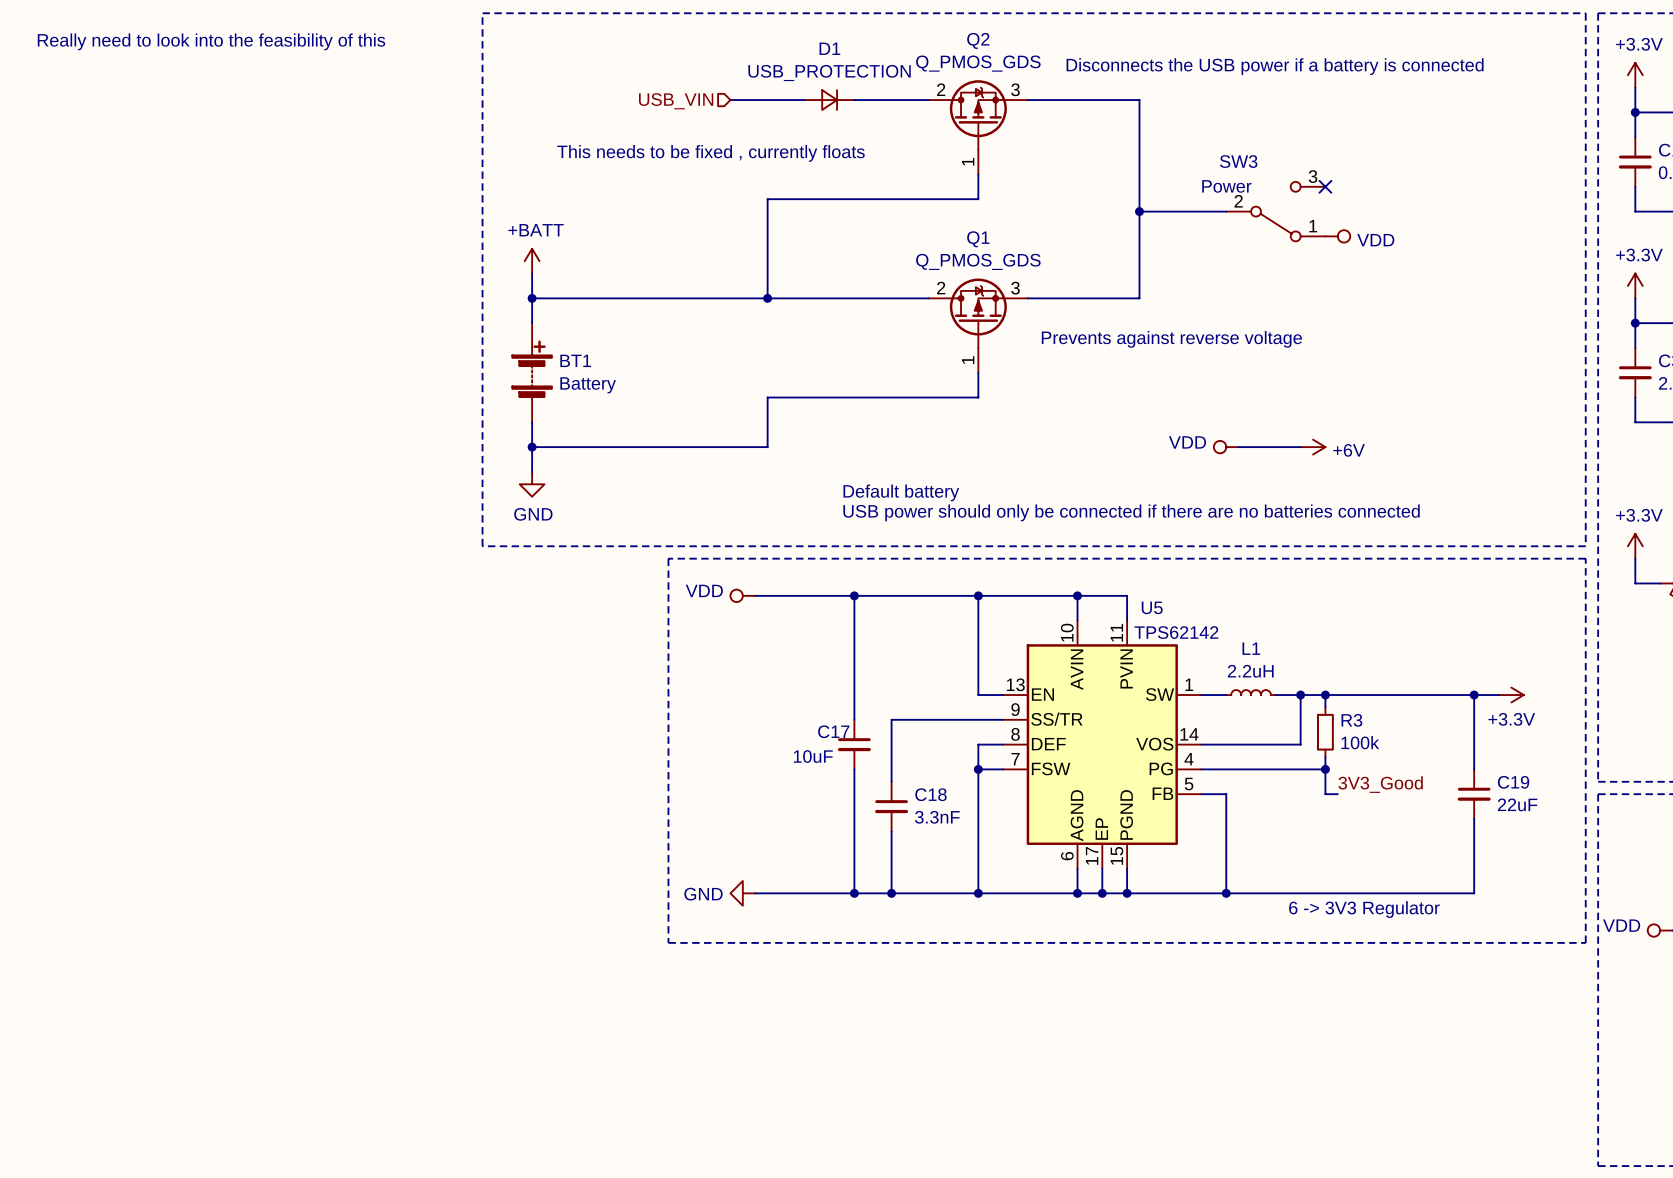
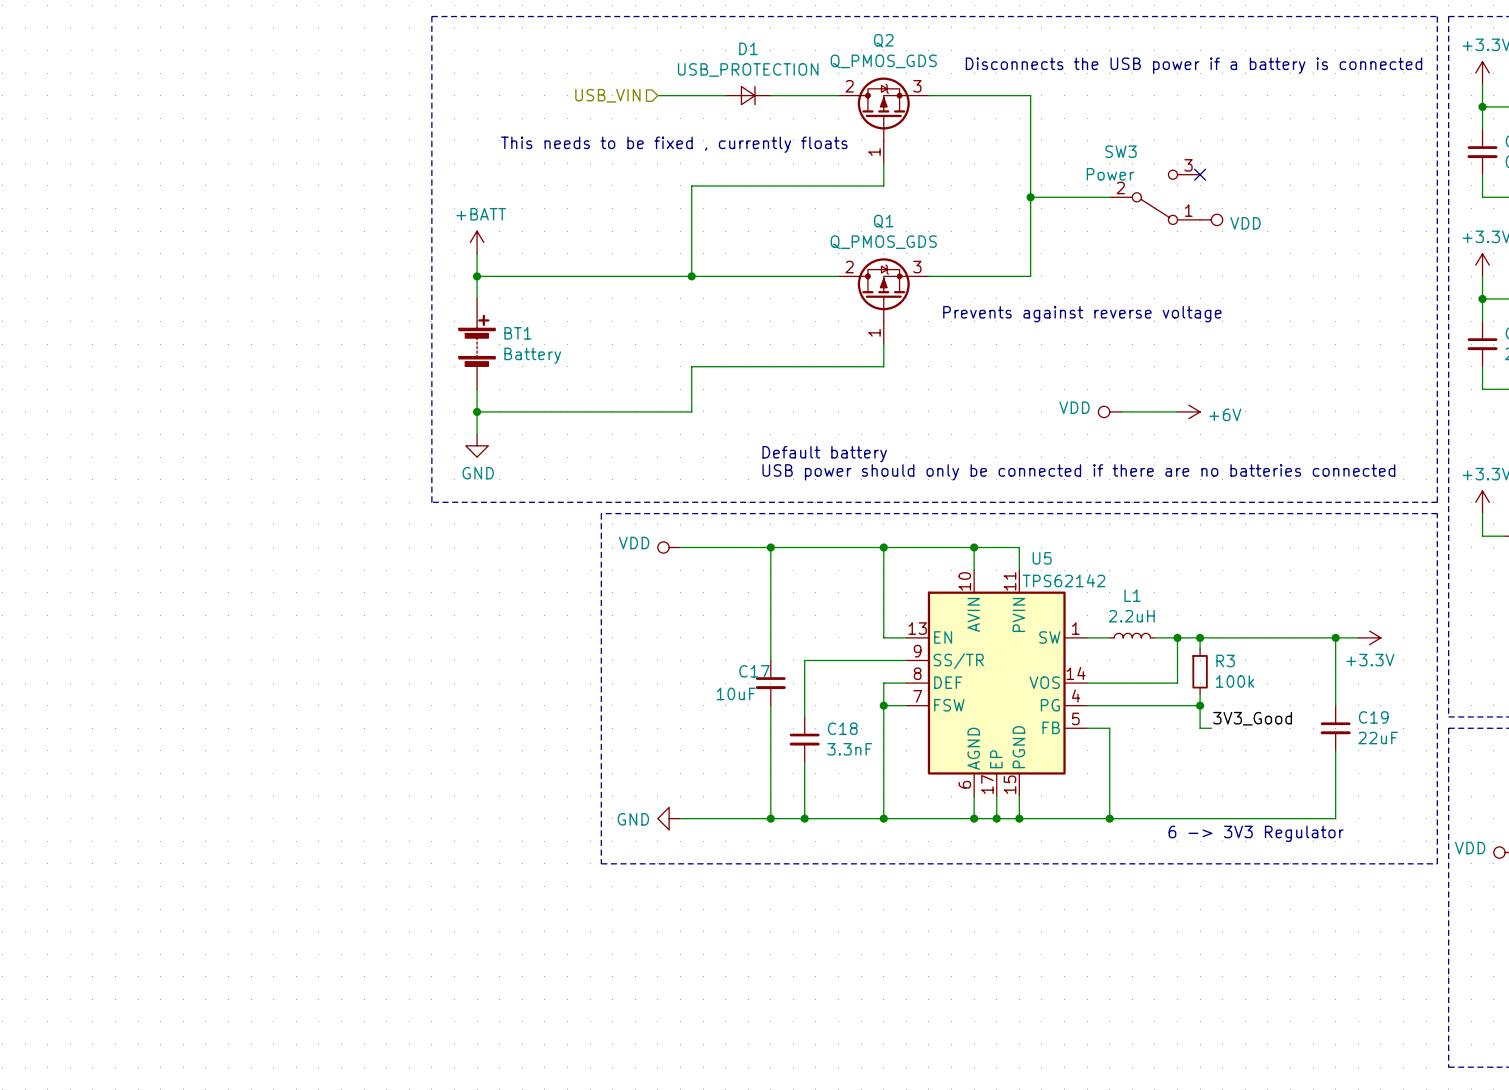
text: Really need to look into the feasibility of this (211, 41) -> none

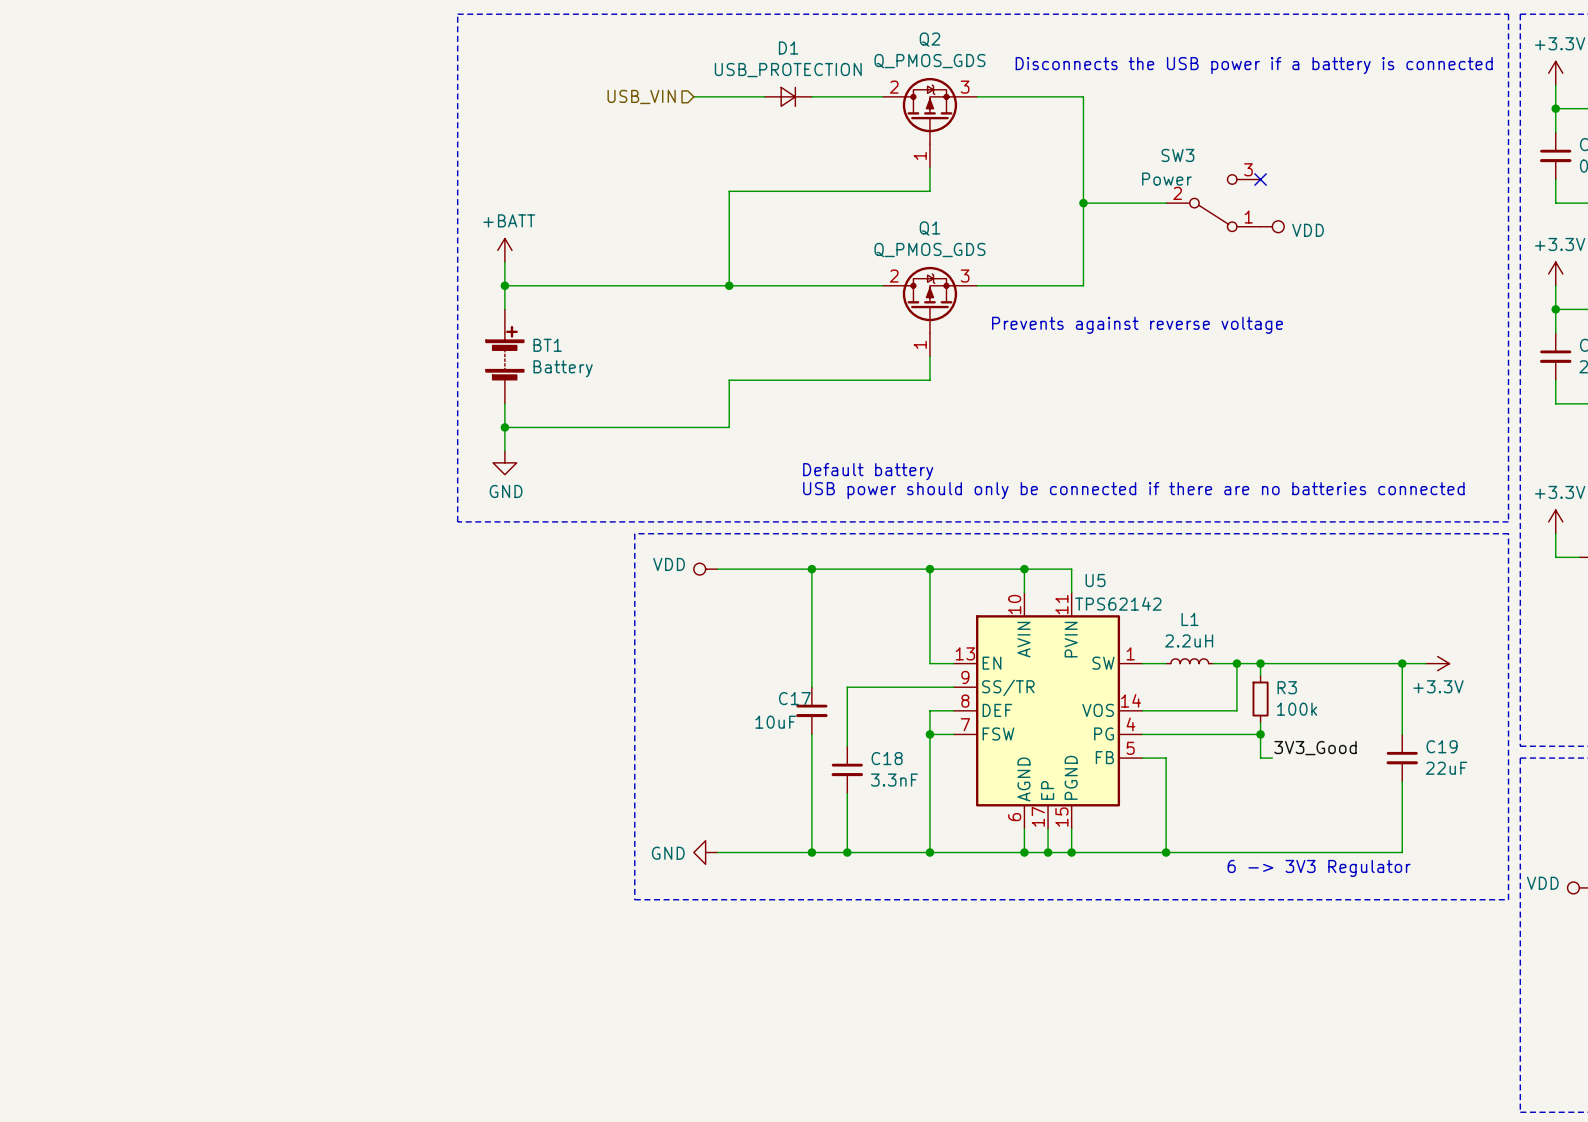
text: This needs to be fixed , currently floats (674, 144) -> none
power symbol: VDD (1109, 411) -> none
wire: (1121, 411) (1177, 411) -> none
power symbol: +6V (1188, 411) -> none

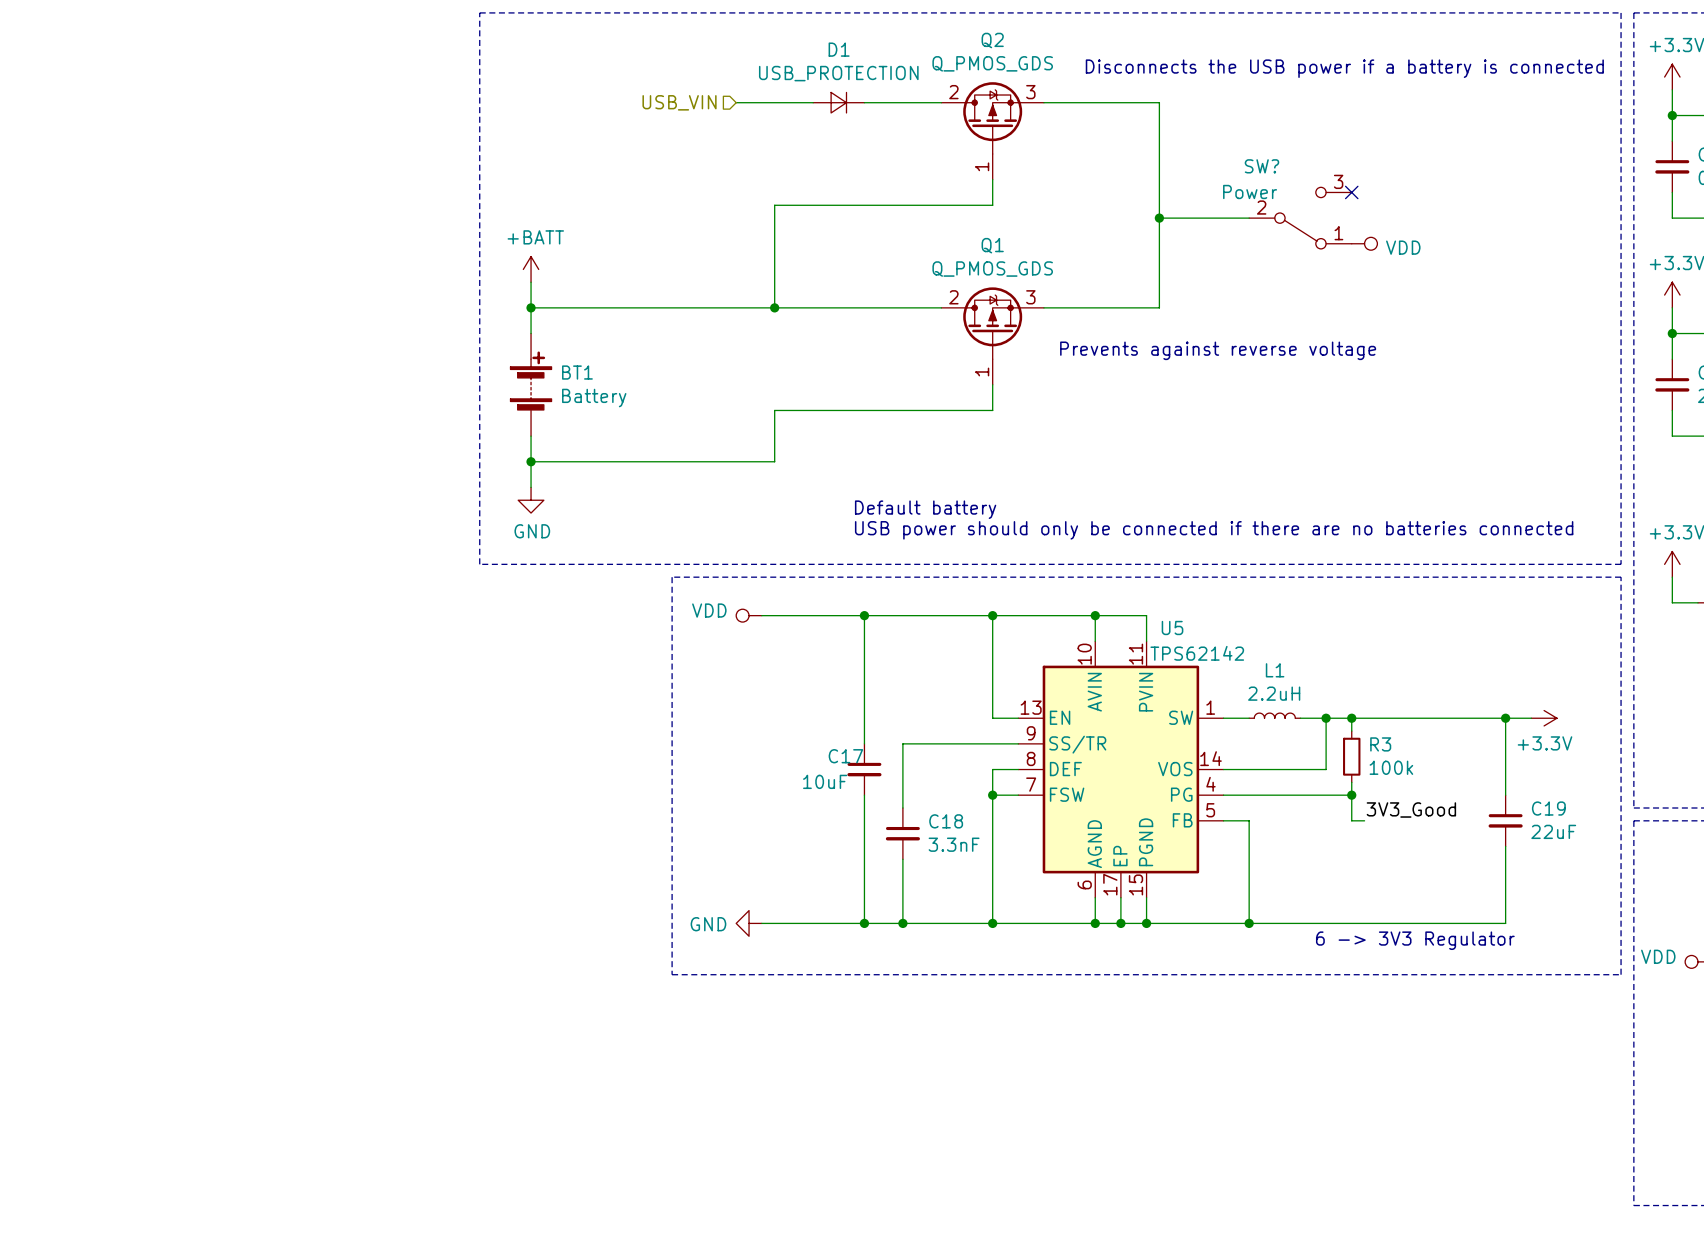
SW3 name: SW3 (1177, 155) -> SW? (1261, 166)

